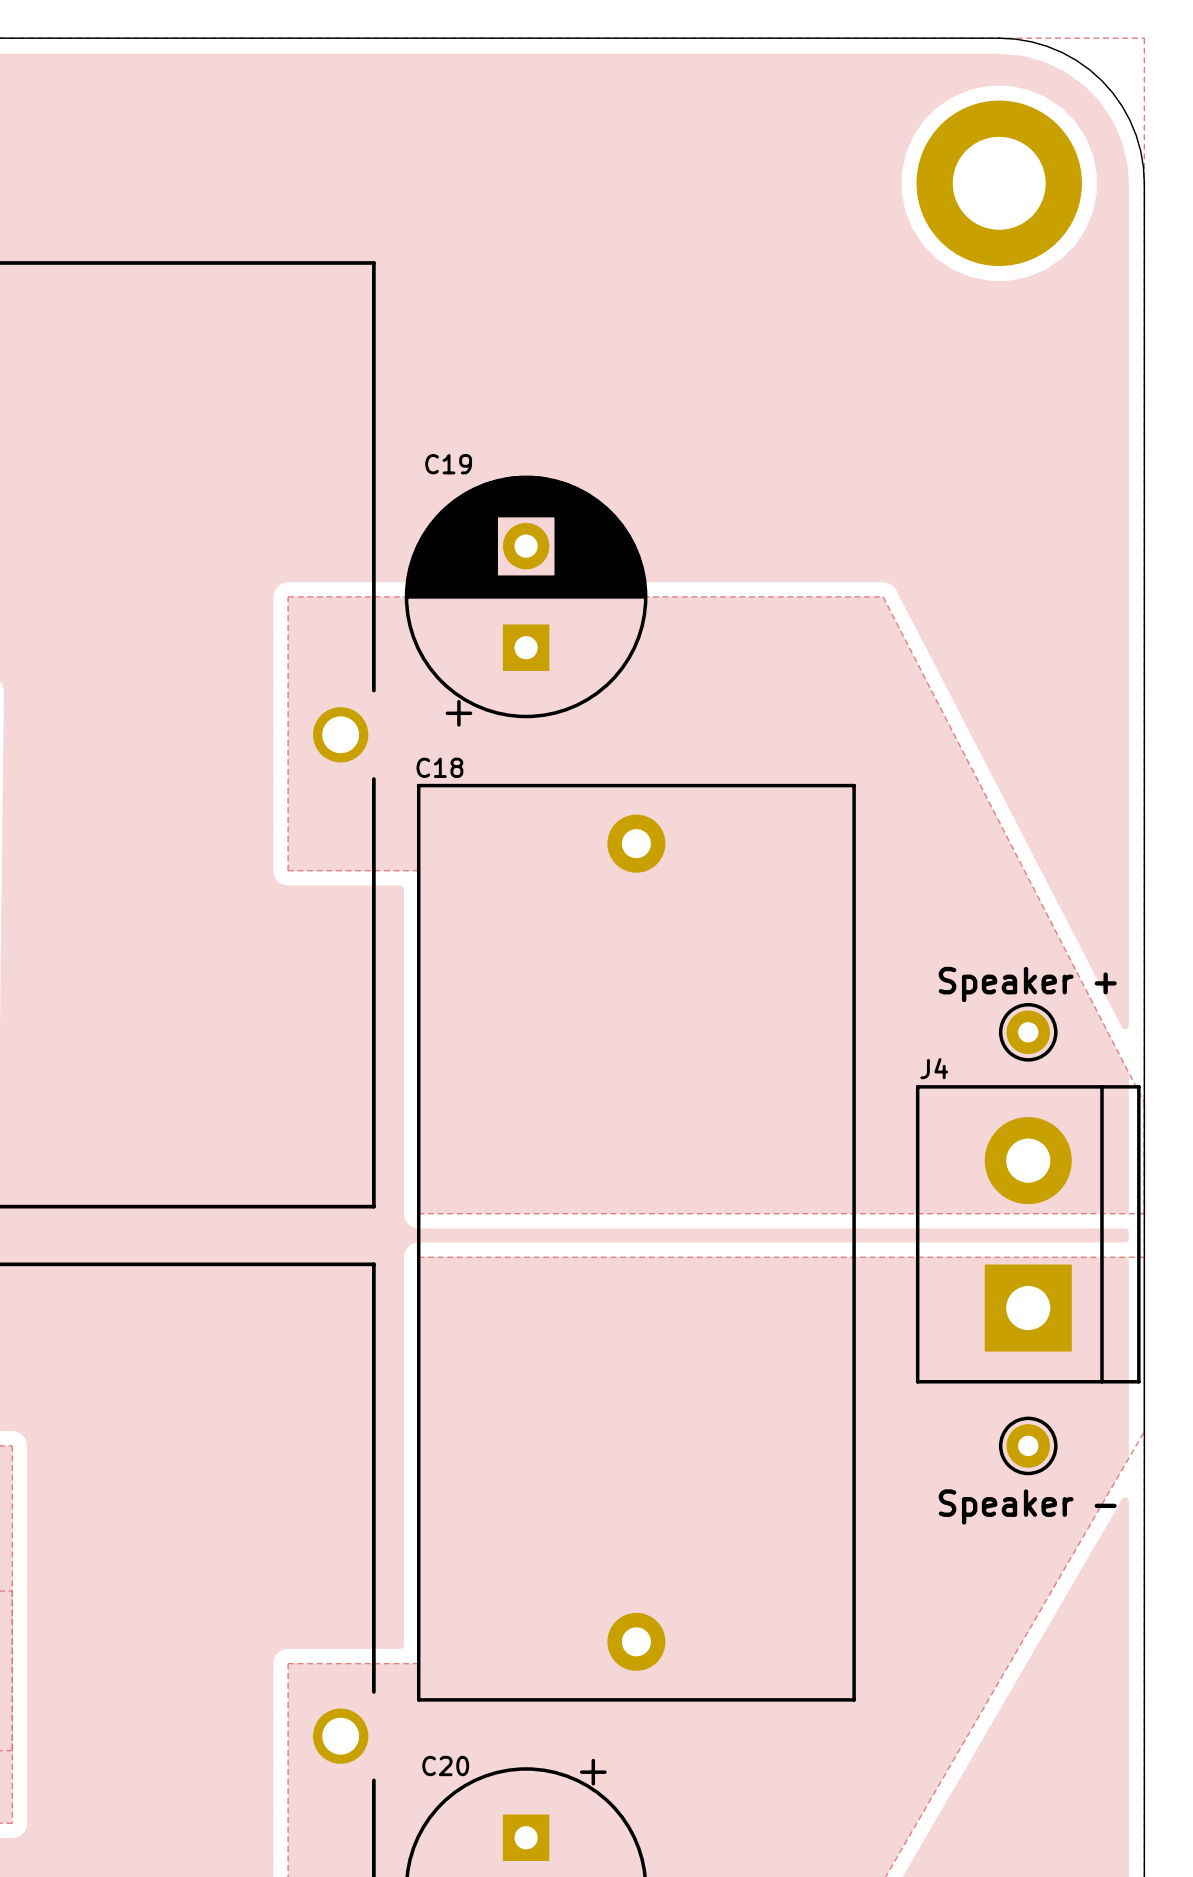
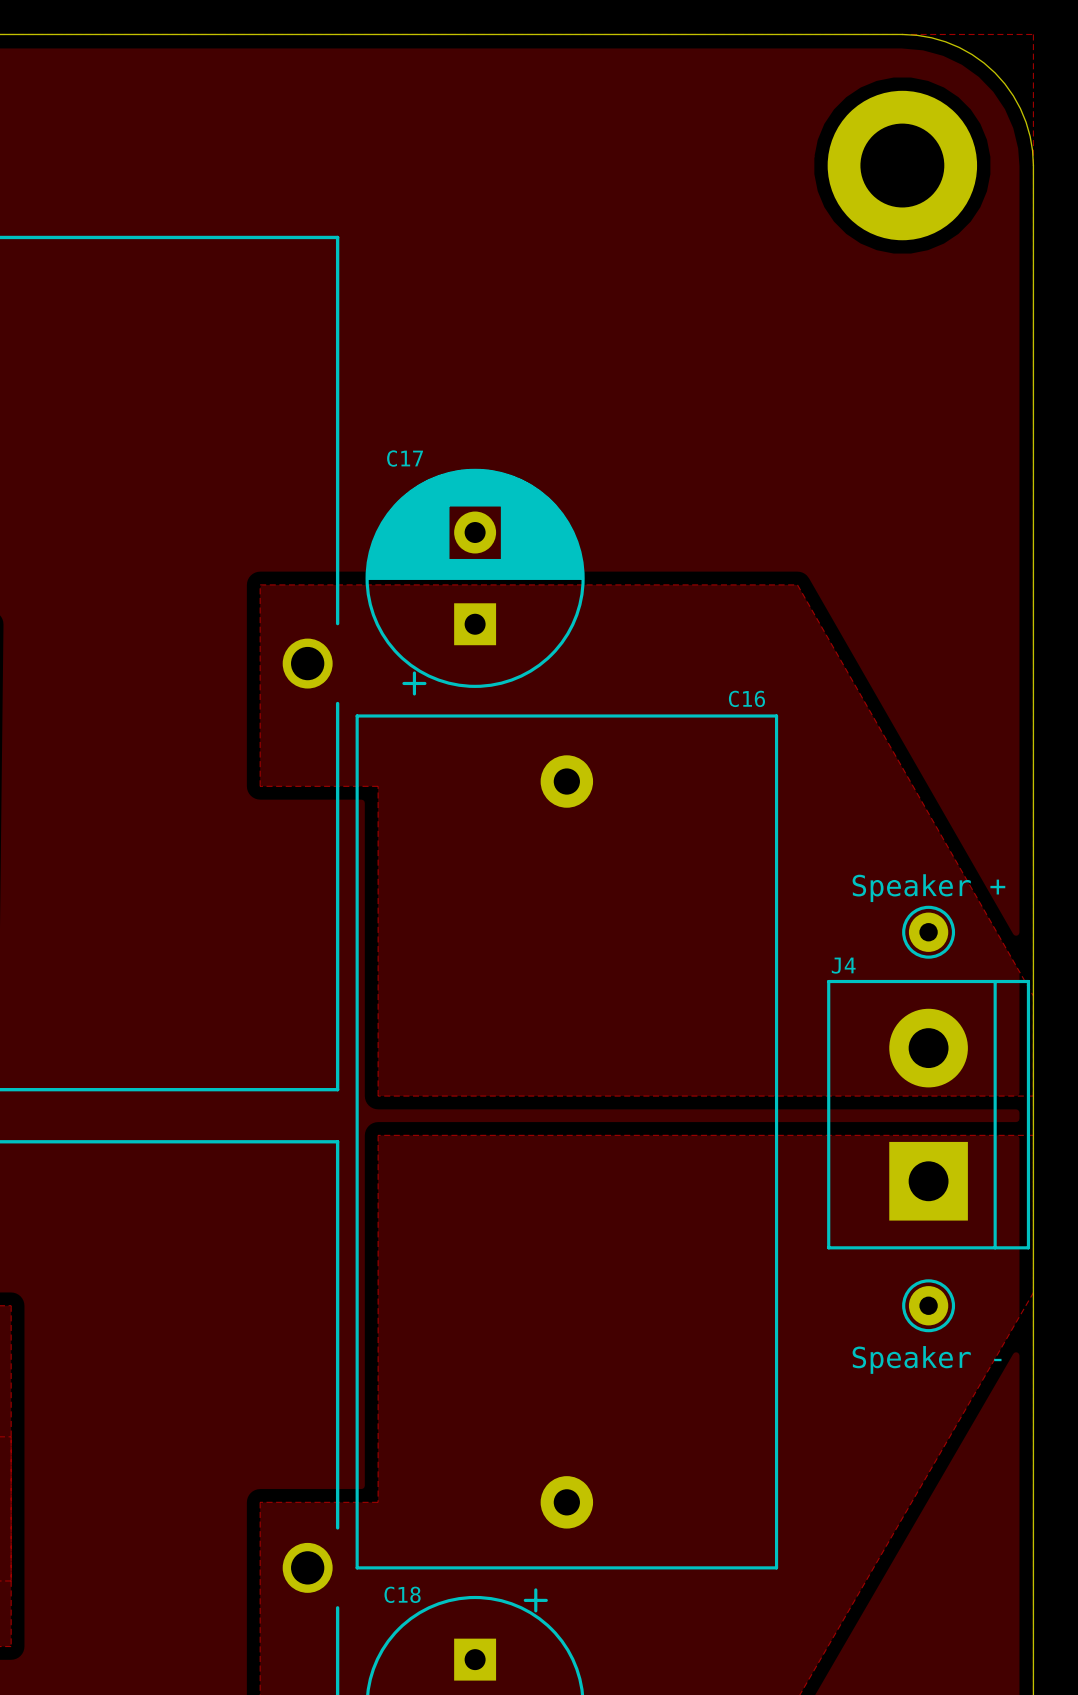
C19: (526, 601) -> none
C17: none -> (475, 582)
zone outline: (288, 647) (288, 596) (883, 596) (1144, 1102) -> (260, 584) (797, 584) (1033, 996)
C18: (636, 1242) -> none
C16: none -> (566, 1141)
C20 name: C20 (445, 1766) -> C18 (402, 1594)

